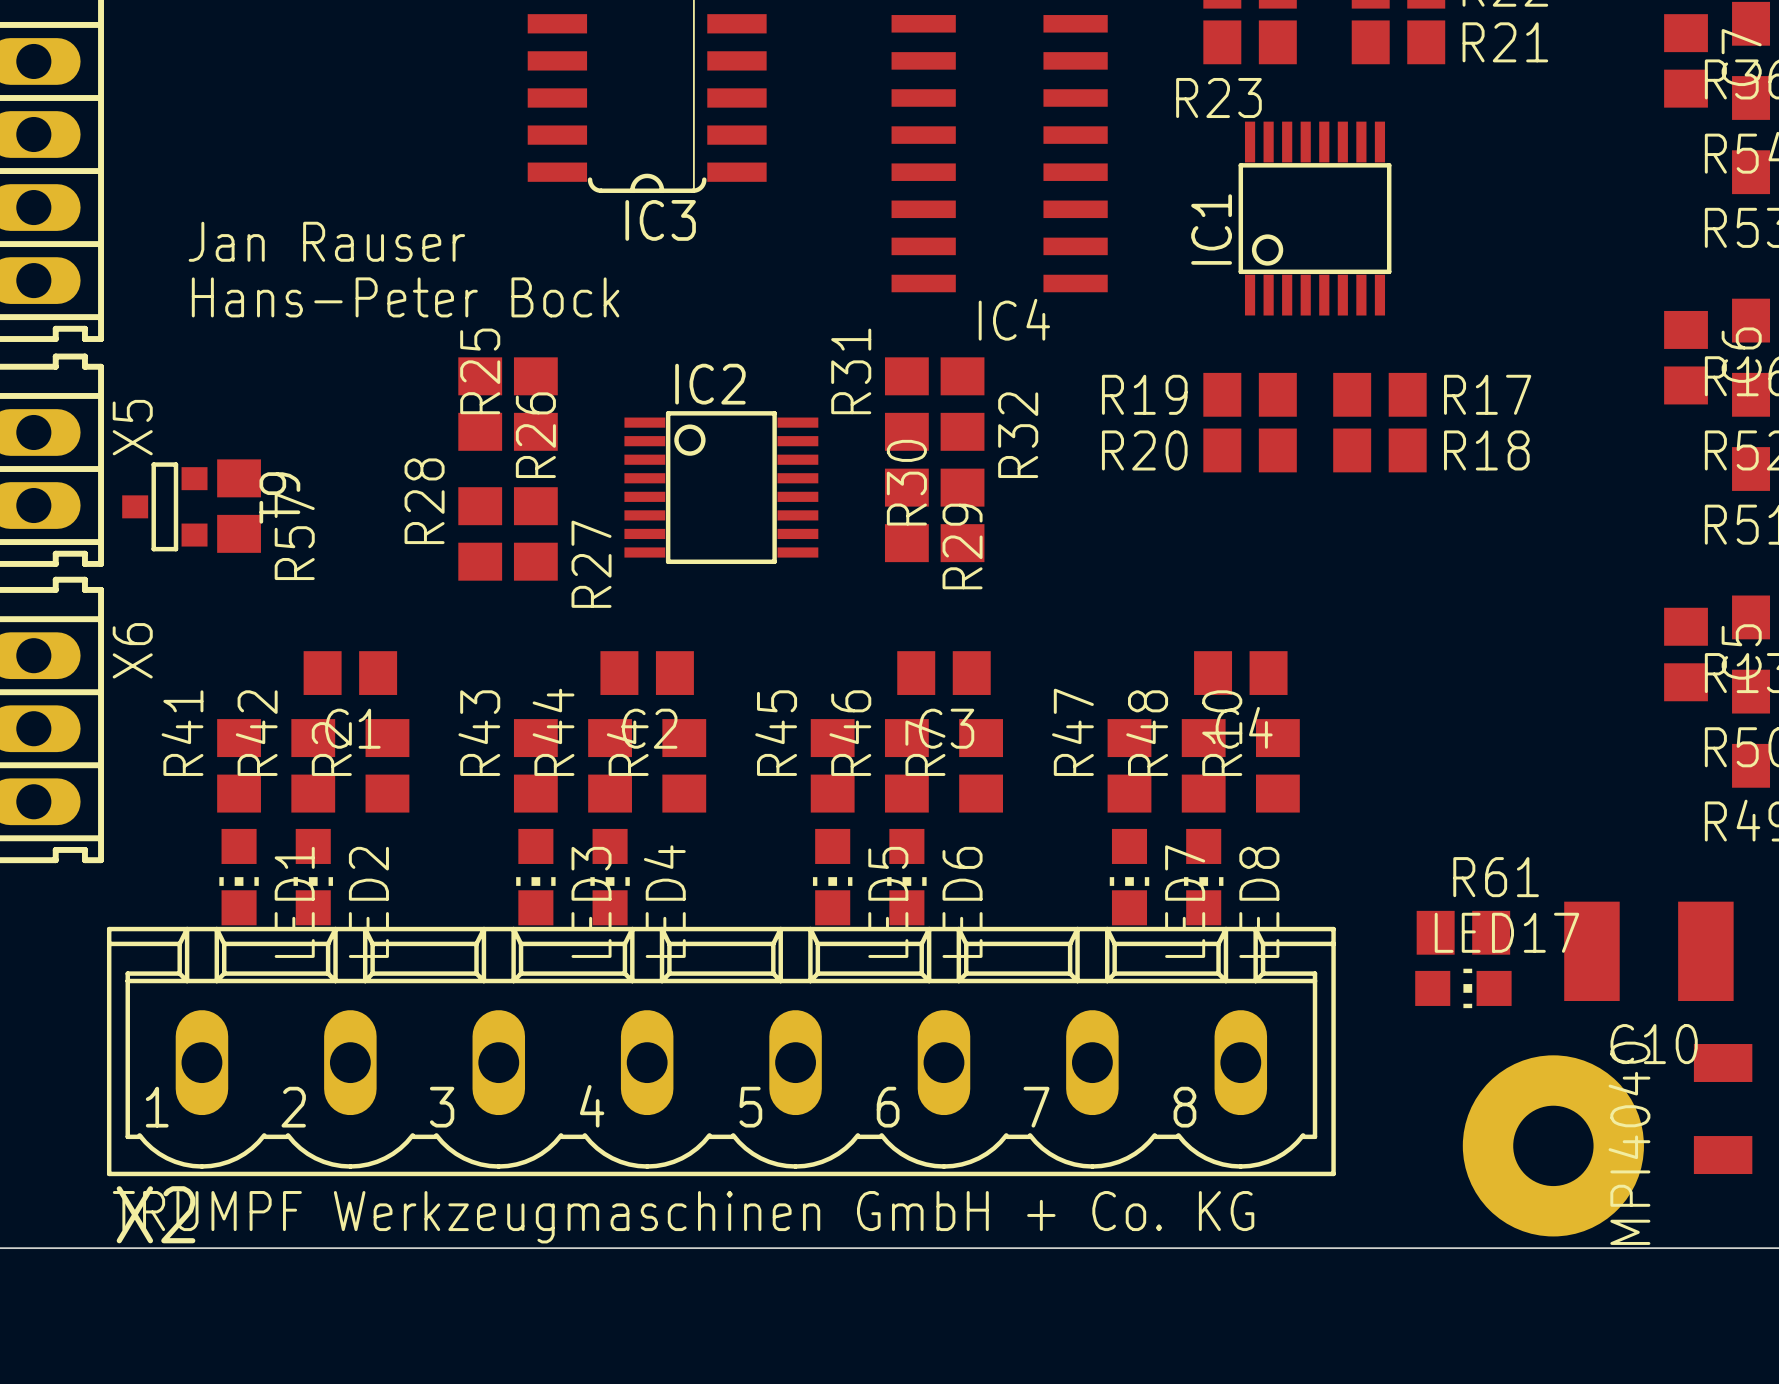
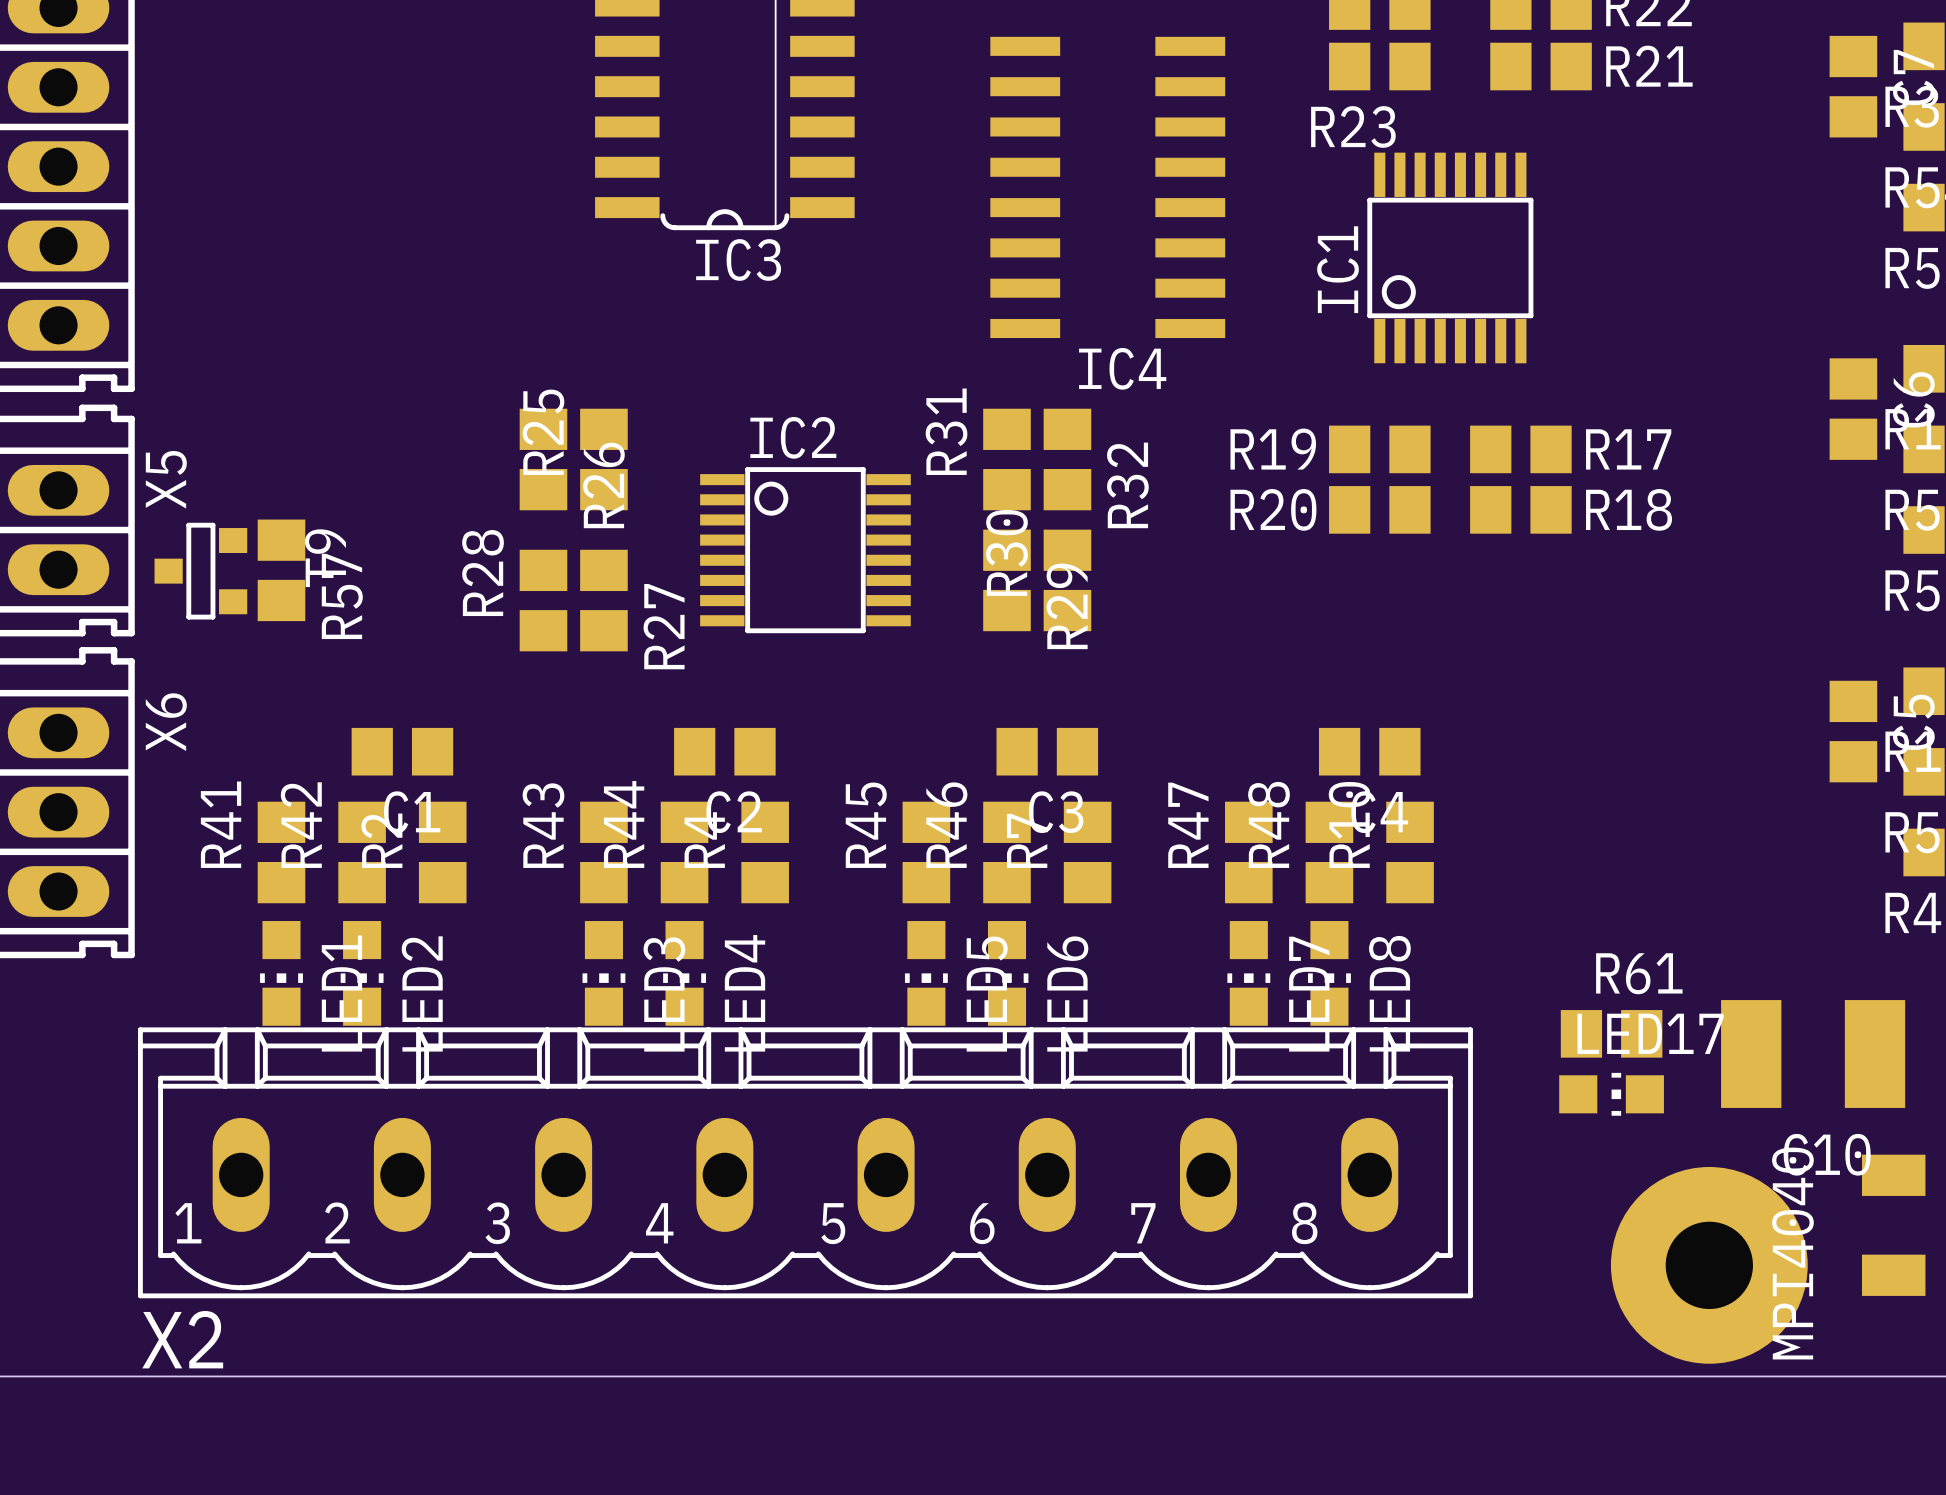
text: Jan Rauser (326, 241) -> none
text: Hans-Peter Bock (405, 297) -> none
text: TRUMPF Werkzeugmaschinen GmbH + Co. KG (683, 1217) -> none

